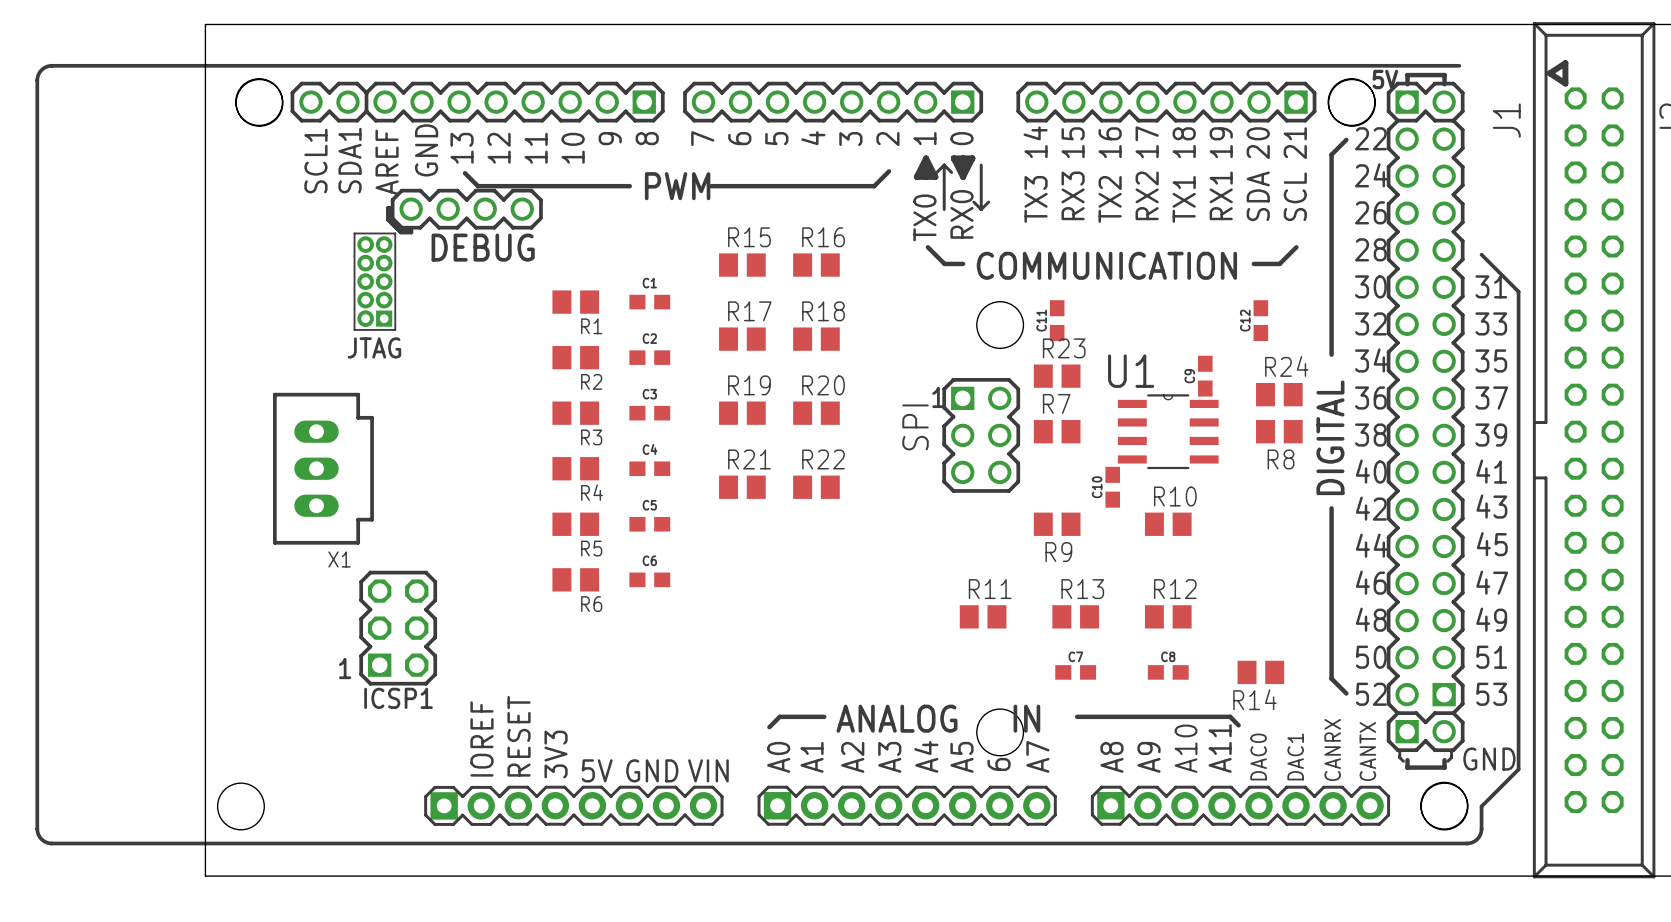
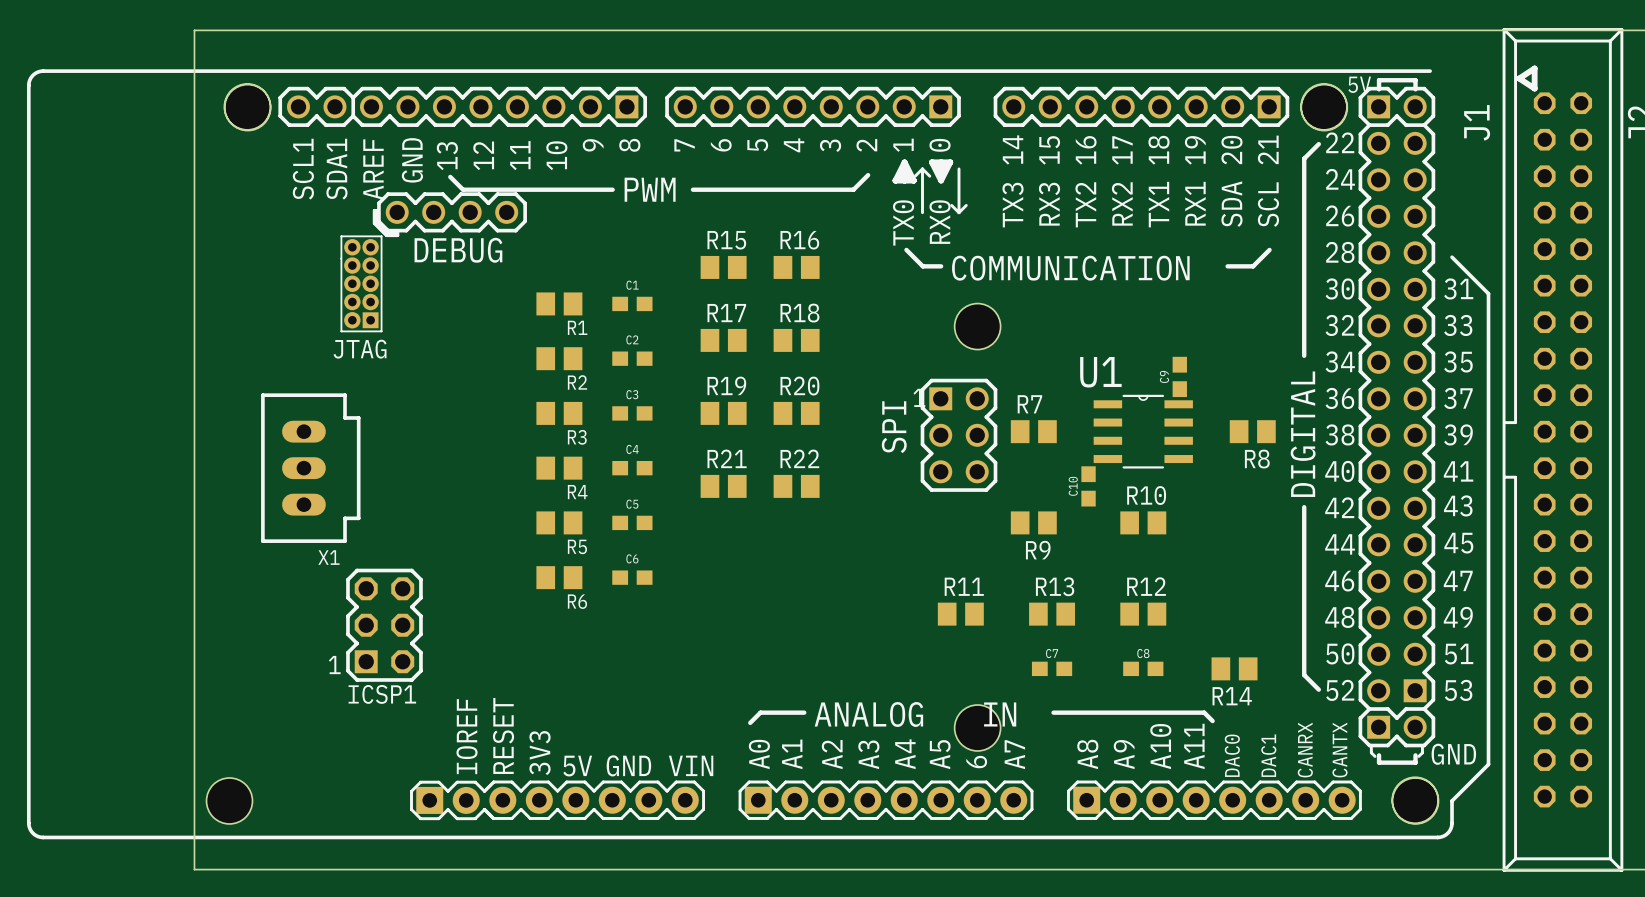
C11: (1057, 320) -> none
C12: (1260, 320) -> none
R23: (1057, 376) -> none
R24: (1279, 394) -> none

